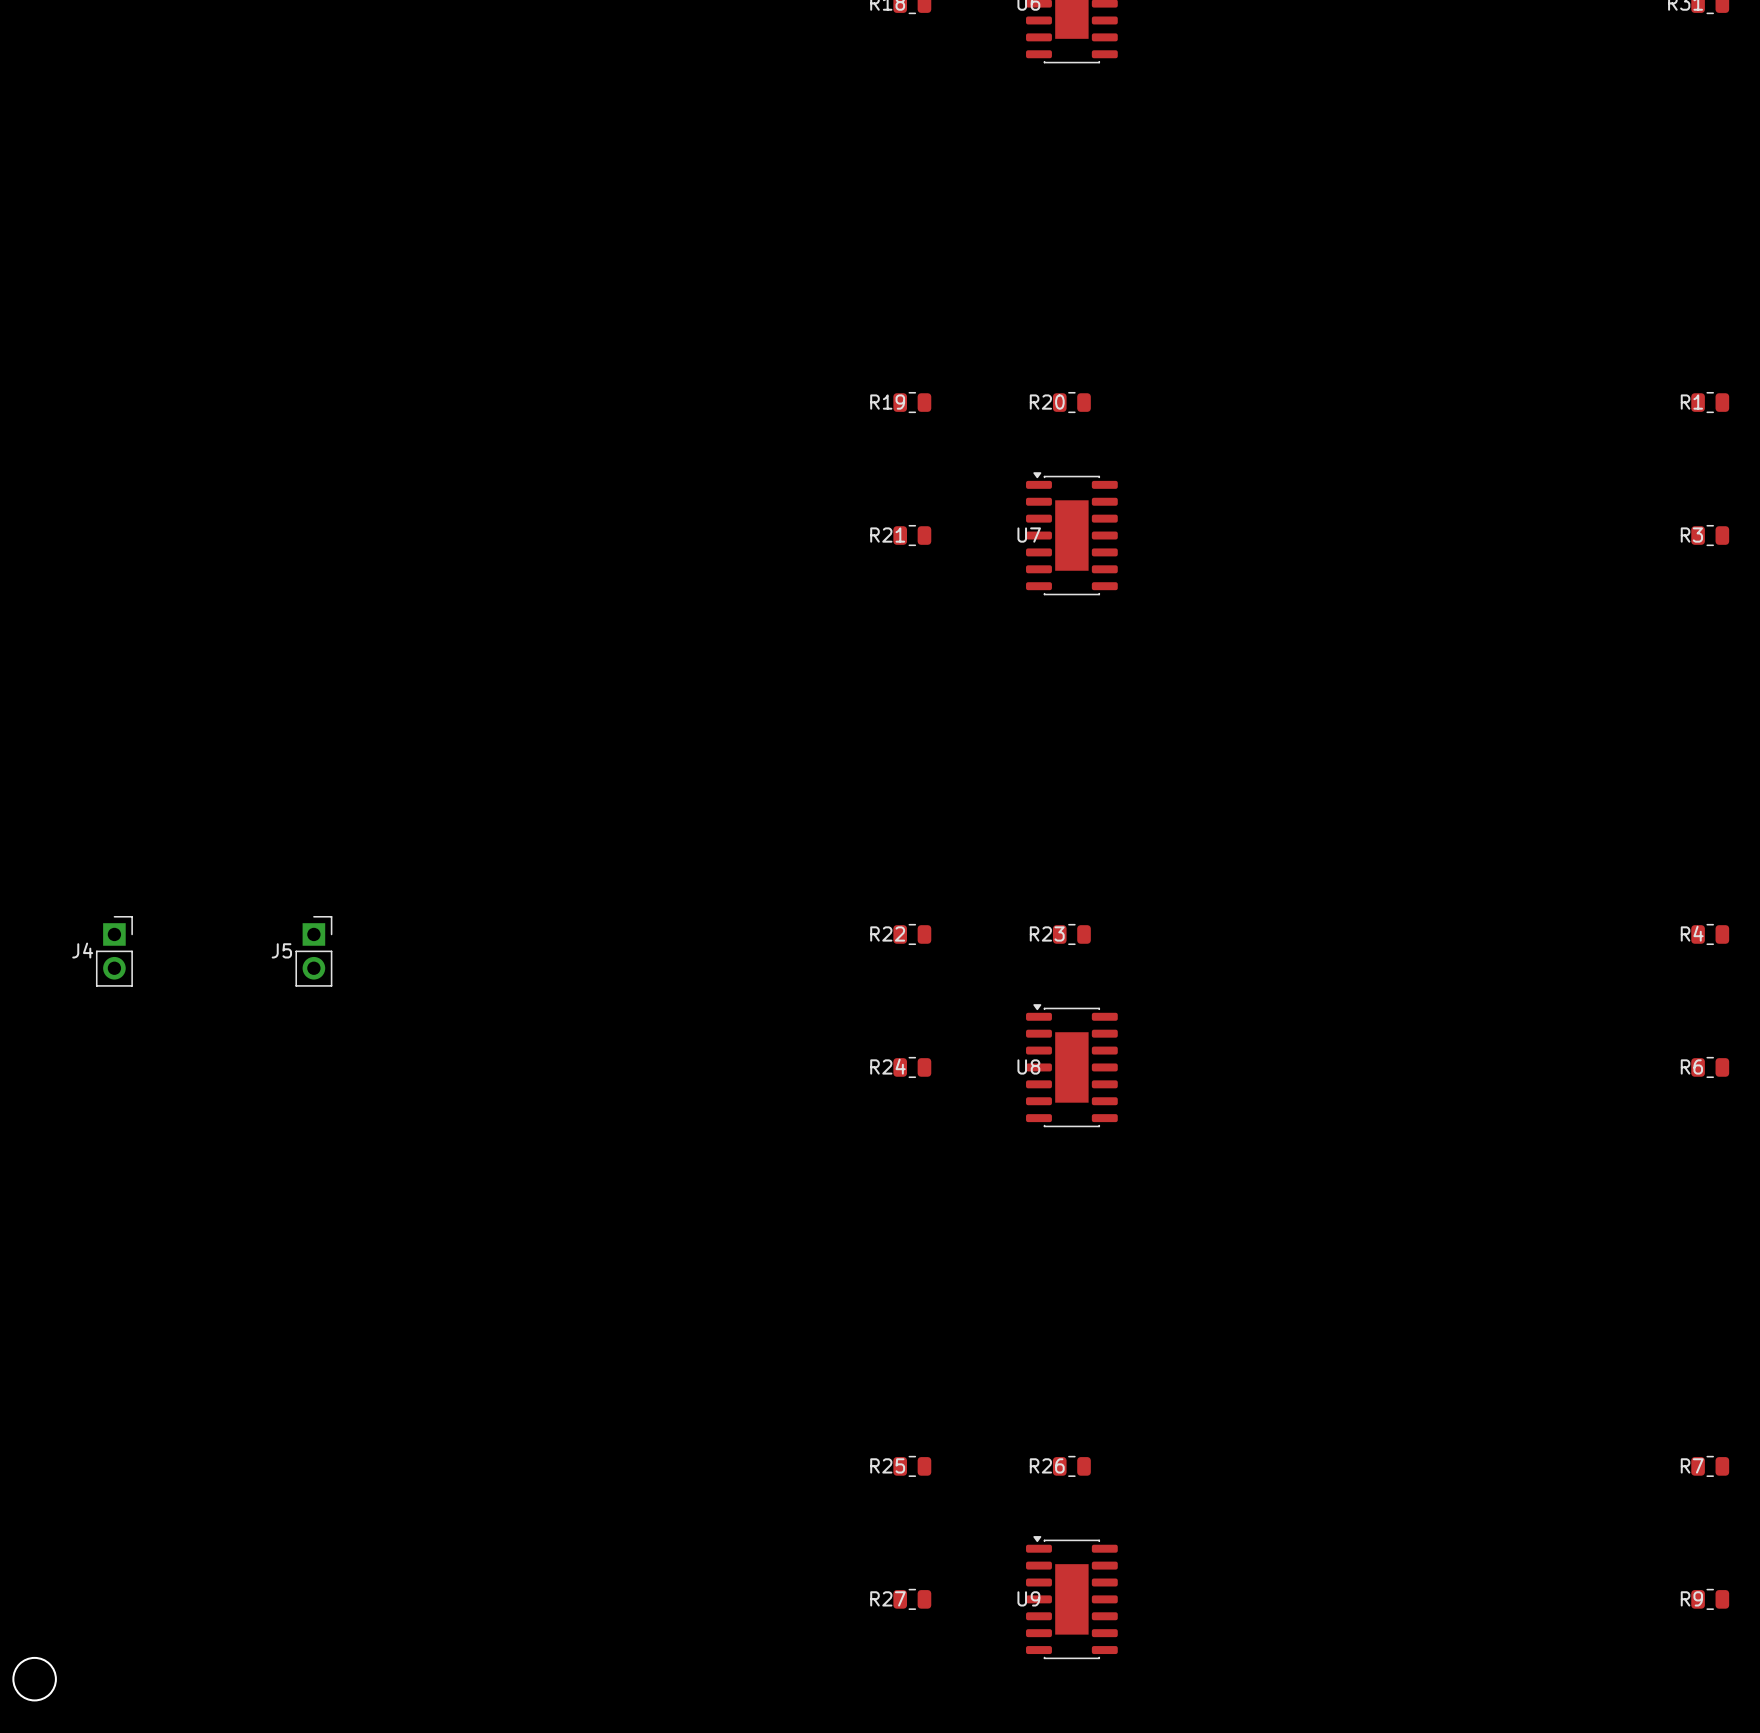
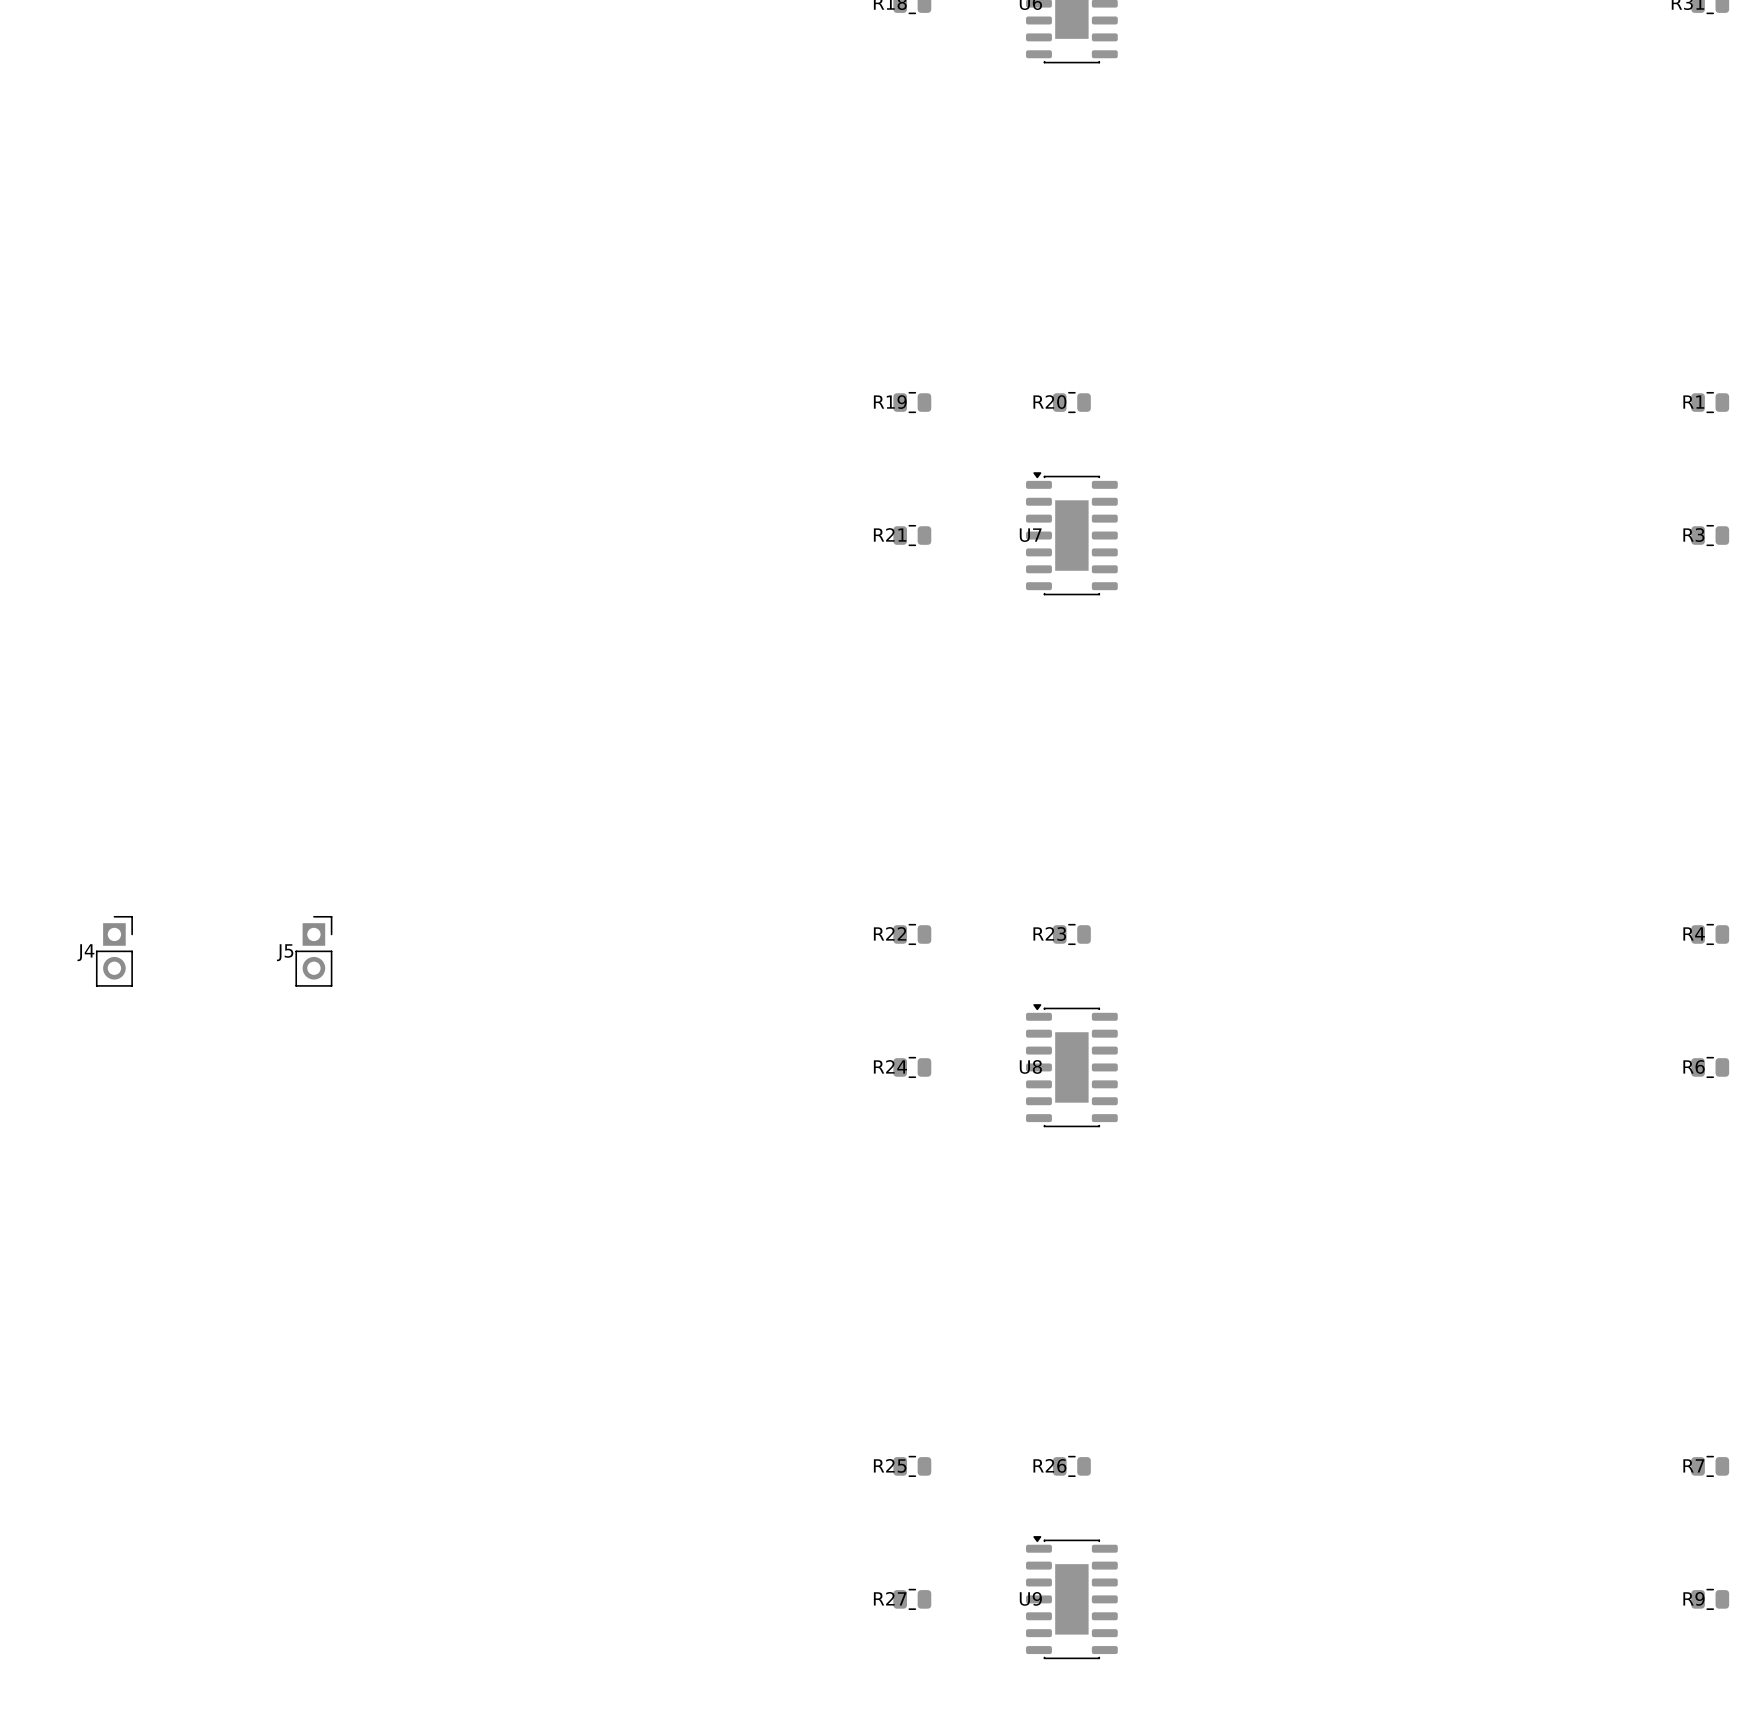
round board edge: [12, 1656, 57, 1702] -> none

